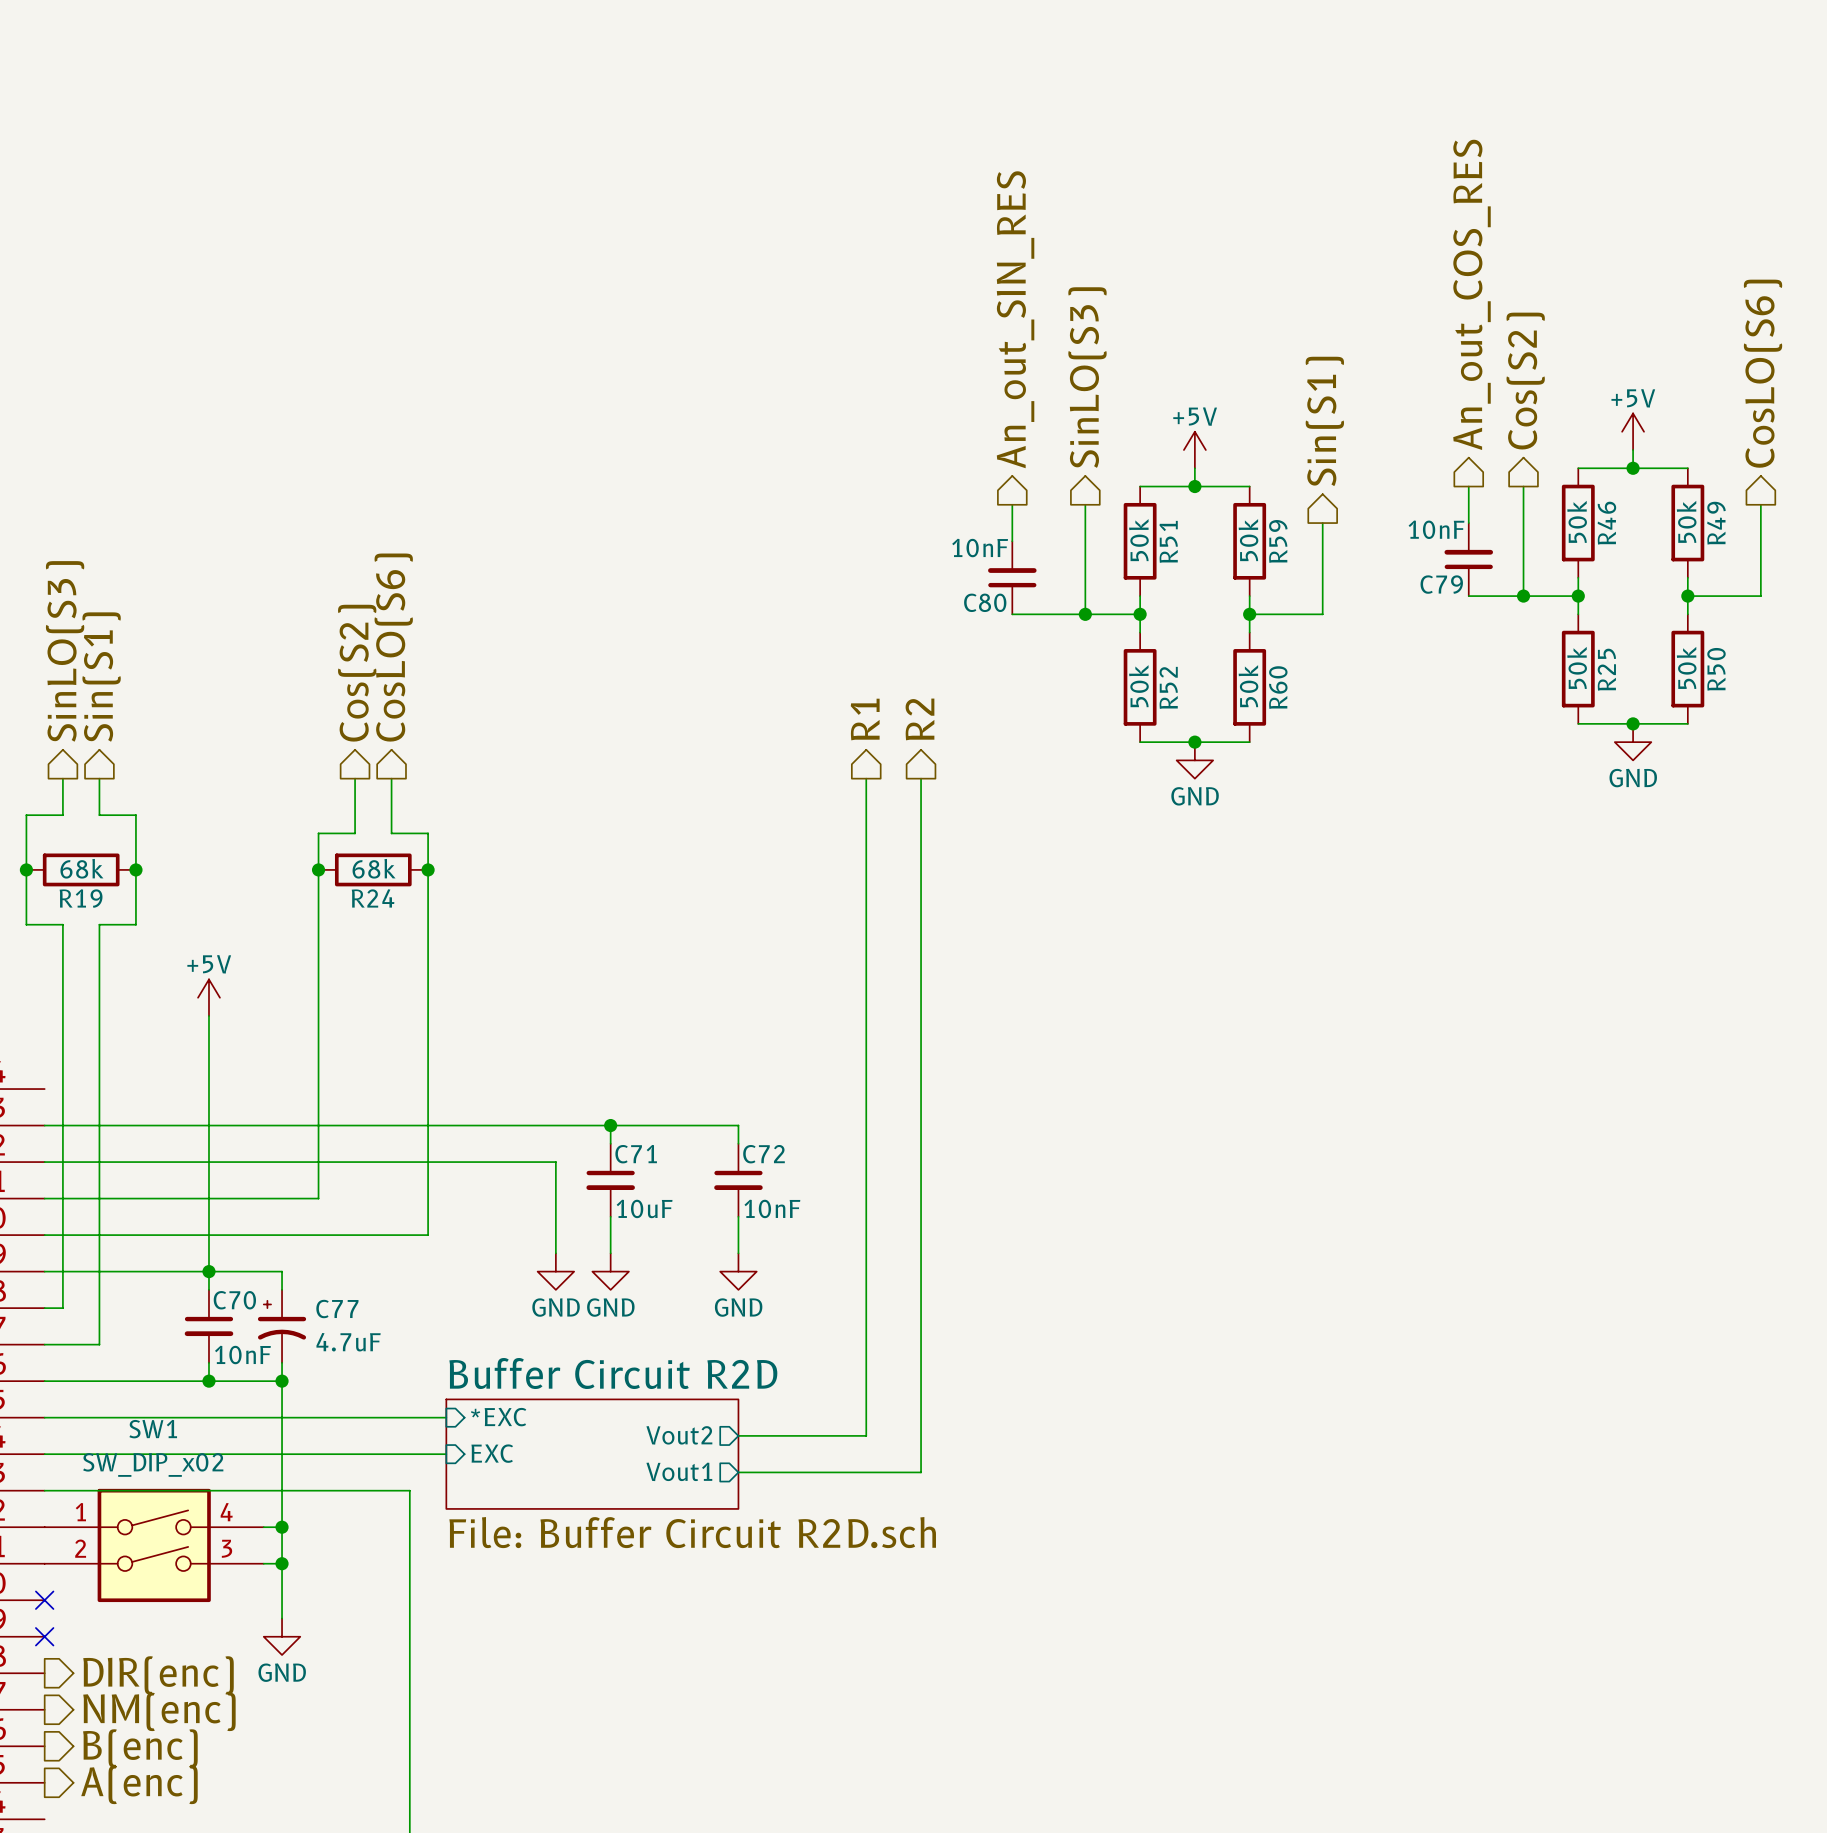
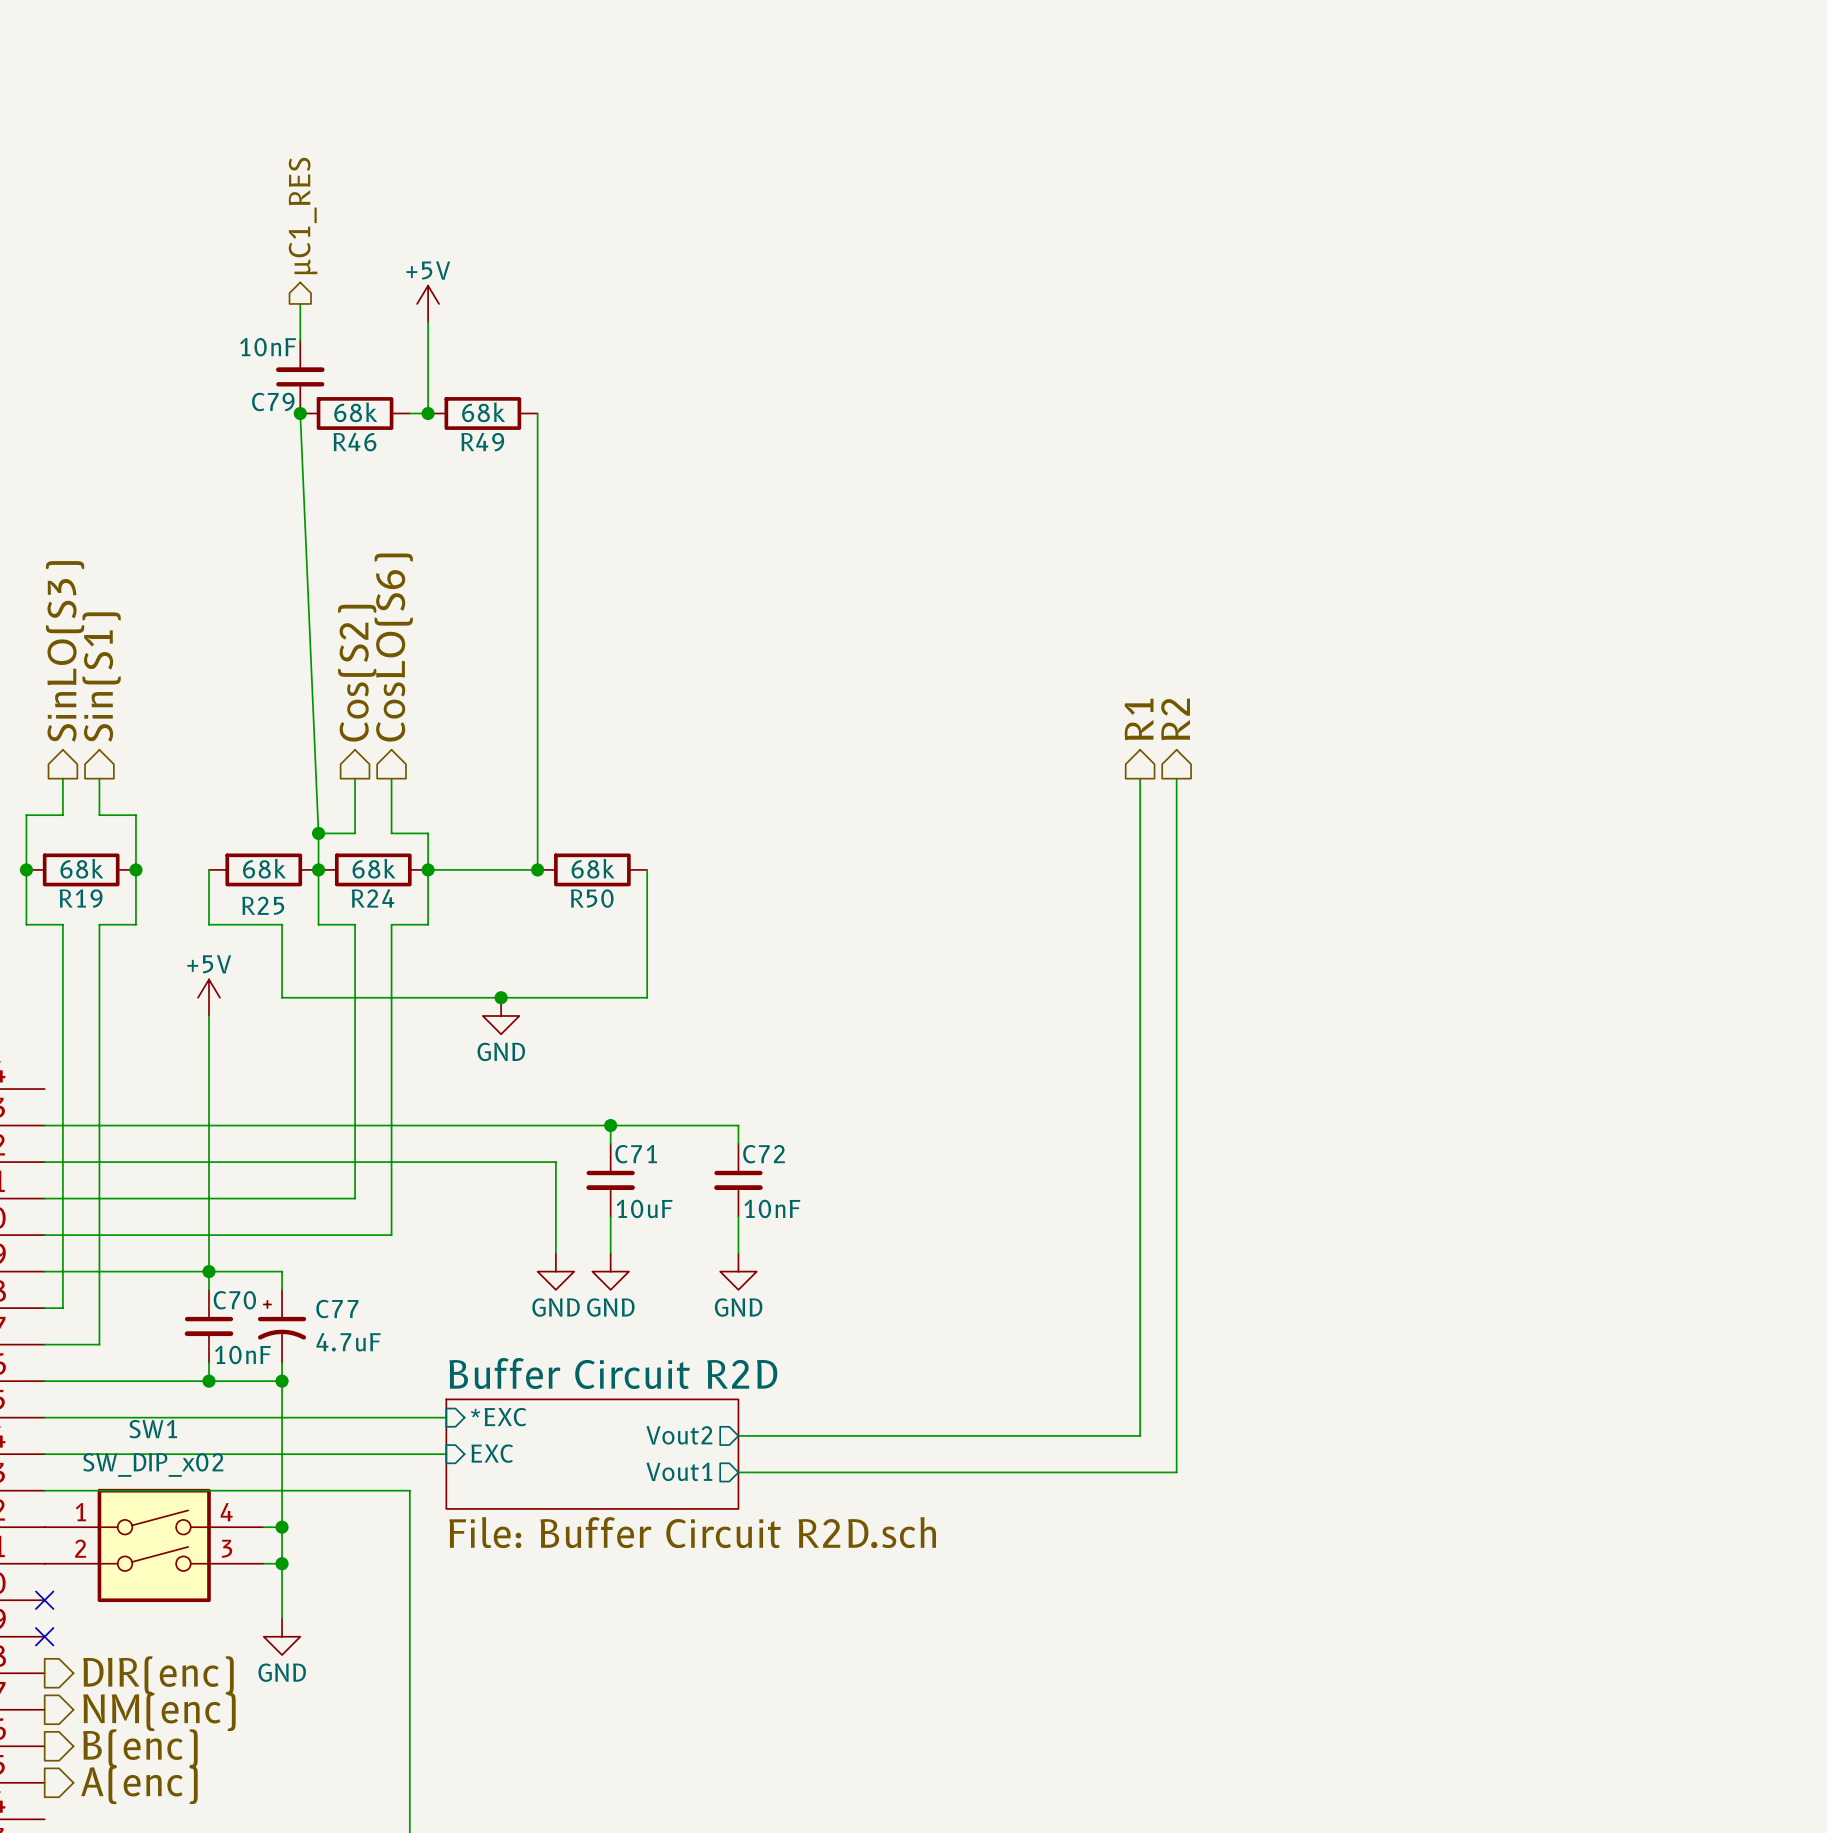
hierarchical label: none -> µC1_RES (303, 215)
hierarchical label: An_out_COS_RES (1471, 294) -> none
wire: none -> (300, 303) (300, 340)
power symbol: none -> +5V (428, 303)
hierarchical label: An_out_SIN_RES (1015, 319) -> none
wire: none -> (428, 322) (428, 413) (409, 413)
hierarchical label: CosLO(S6) (1763, 373) -> none
hierarchical label: SinLO(S3) (1087, 377) -> none
hierarchical label: Cos(S2) (1525, 381) -> none
wire: none -> (300, 413) (318, 833)
junction: none -> (300, 413)
junction: none -> (428, 413)
wire: none -> (537, 413) (537, 869) (428, 869)
hierarchical label: Sin(S1) (1324, 421) -> none
power symbol: +5V (1633, 431) -> none
power symbol: +5V (1194, 450) -> none
wire: (1633, 450) (1633, 468) -> none
wire: (1194, 468) (1194, 486) -> none
wire: (1578, 468) (1687, 468) -> none
junction: (1633, 468) -> none
wire: (1140, 486) (1249, 486) -> none
junction: (1194, 486) -> none
wire: (1468, 486) (1468, 523) -> none
wire: (1523, 486) (1523, 596) -> none
wire: (1012, 504) (1012, 541) -> none
wire: (1085, 504) (1085, 614) -> none
wire: (1760, 504) (1760, 596) (1687, 596) -> none
R46 value: 50k (1577, 521) -> 68k (355, 412)
R49 value: 50k (1686, 521) -> 68k (483, 412)
wire: (1322, 523) (1322, 614) (1249, 614) -> none
R46 rotation: 0° (1578, 523) -> 90° clockwise (355, 413)
R46 position: (1578, 523) -> (355, 413)
R49 rotation: 0° (1687, 523) -> 90° clockwise (482, 413)
R49 position: (1687, 523) -> (482, 413)
R51: 50k (1140, 541) -> none
R59: 50k (1249, 541) -> none
C79 position: (1468, 559) -> (300, 376)
C80: 10nF (1012, 577) -> none
wire: (1578, 577) (1578, 614) -> none
wire: (1687, 577) (1687, 614) -> none
wire: (1140, 596) (1140, 632) -> none
wire: (1249, 596) (1249, 632) -> none
wire: (1468, 596) (1578, 596) -> none
junction: (1523, 596) -> none
junction: (1578, 596) -> none
junction: (1687, 596) -> none
wire: (1012, 614) (1140, 614) -> none
junction: (1085, 614) -> none
junction: (1140, 614) -> none
junction: (1249, 614) -> none
R25 value: 50k (1577, 667) -> 68k (264, 868)
R50 value: 50k (1686, 667) -> 68k (593, 868)
R25 rotation: 0° (1578, 669) -> 90° clockwise (263, 869)
R25 position: (1578, 669) -> (263, 869)
R50 rotation: 0° (1687, 669) -> 90° clockwise (592, 869)
R50 position: (1687, 669) -> (592, 869)
R52: 50k (1140, 687) -> none
R60: 50k (1249, 687) -> none
hierarchical label position: R1 (865, 719) -> R1 (1139, 719)
hierarchical label position: R2 (919, 719) -> R2 (1175, 719)
wire: (1578, 723) (1687, 723) -> none
junction: (1633, 723) -> none
wire: (1140, 742) (1249, 742) -> none
junction: (1194, 742) -> none
power symbol: GND (1633, 742) -> none
power symbol: GND (1194, 760) -> none
wire: (866, 778) (866, 1435) -> (1140, 778) (1140, 1435) (866, 1435)
wire: (921, 778) (921, 1472) -> (1176, 778) (1176, 1472) (921, 1472)
junction: none -> (318, 833)
wire: none -> (208, 869) (208, 924) (282, 924) (282, 997) (647, 997) (647, 869)
junction: none -> (537, 869)
wire: (318, 924) (318, 1198) -> (318, 924) (355, 924) (355, 1198) (318, 1198)
wire: (428, 924) (428, 1235) (391, 1235) -> (428, 924) (391, 924) (391, 1235)
junction: none -> (501, 997)
power symbol: none -> GND (501, 1015)

